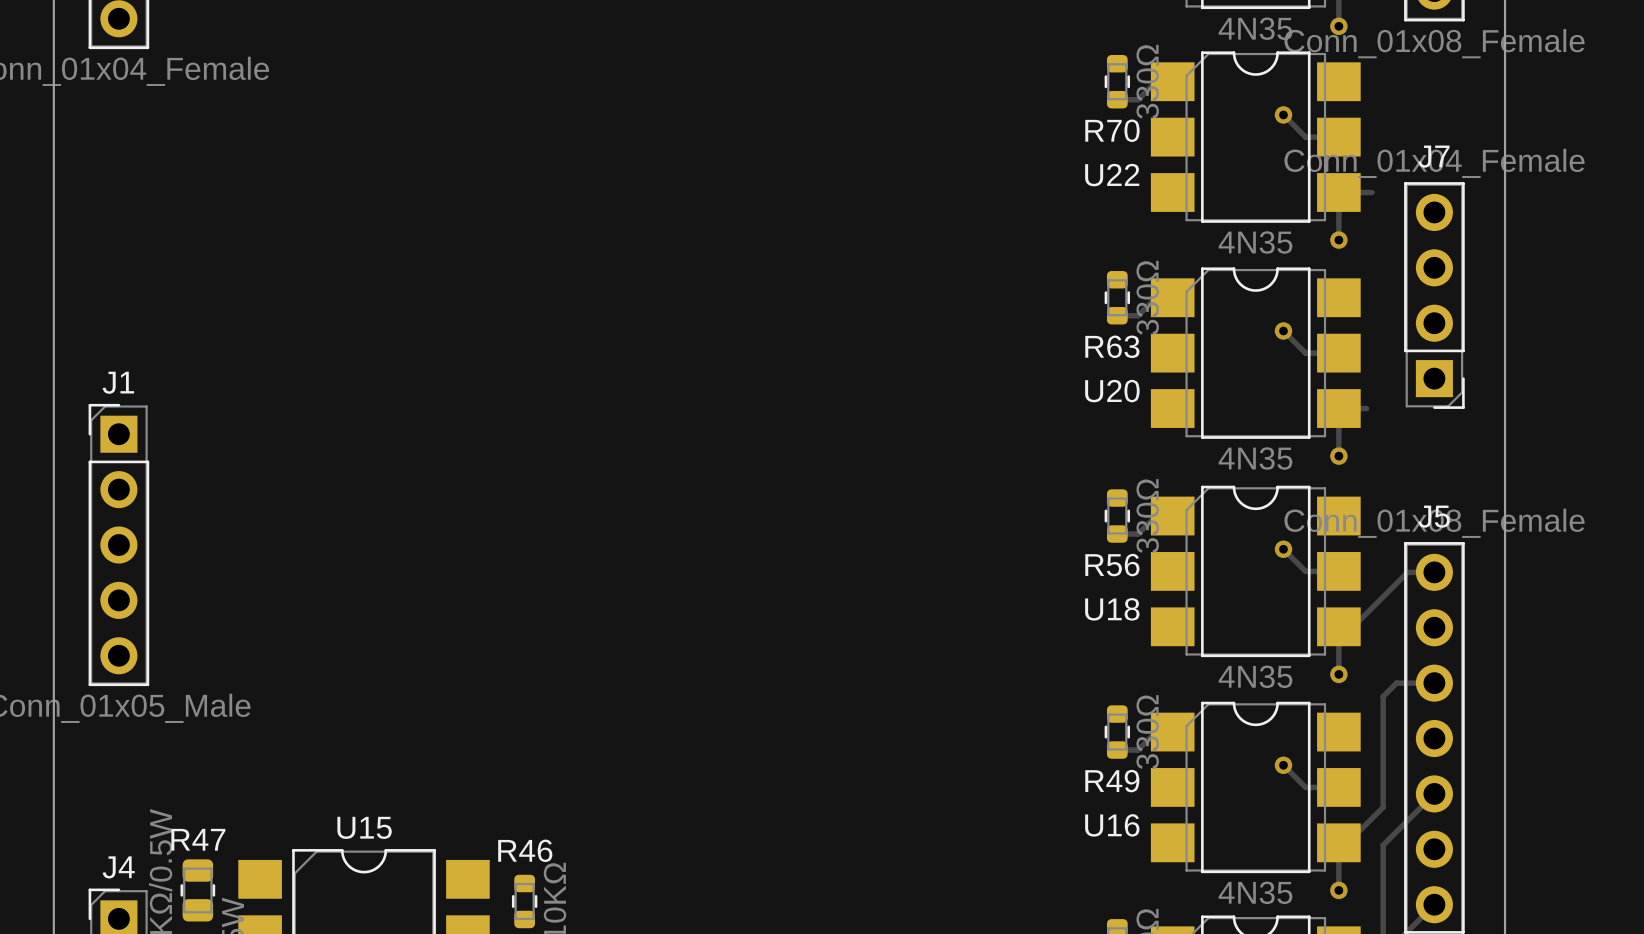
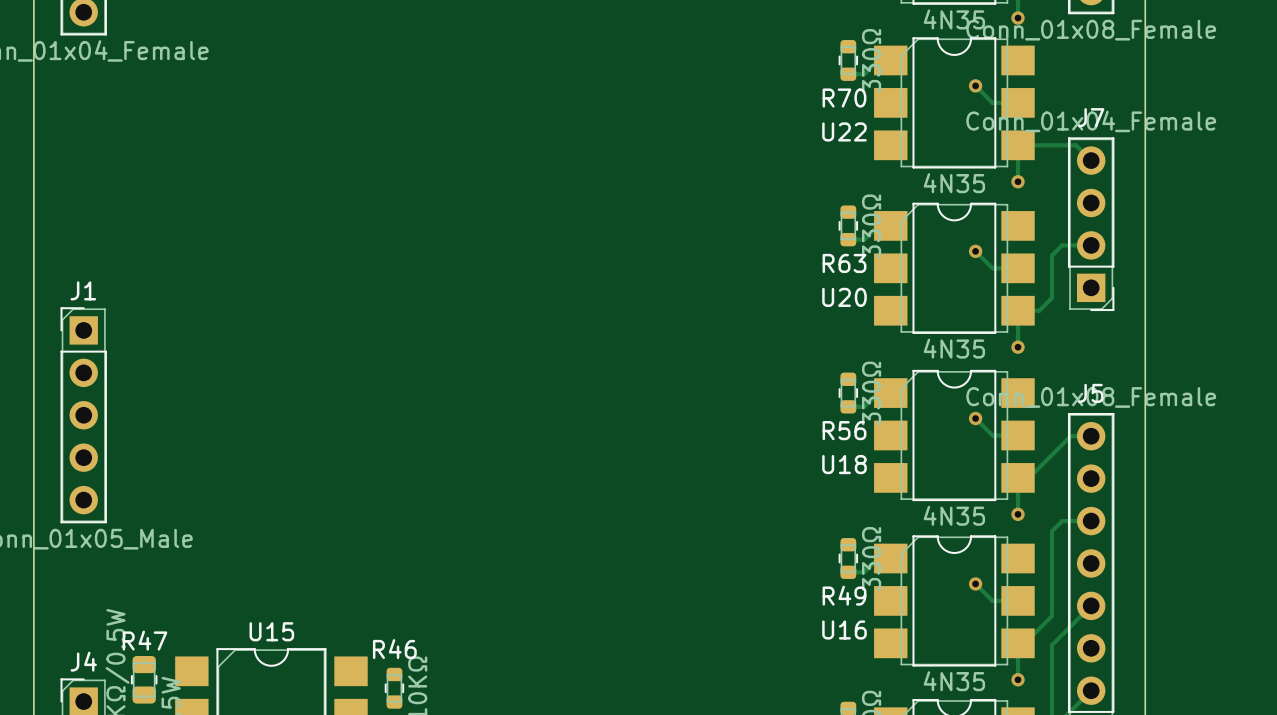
track: none -> (1043, 145) (1075, 145) (1091, 160)
track: none -> (1091, 245) (1062, 245) (1051, 255) (1051, 298) (1039, 310)

